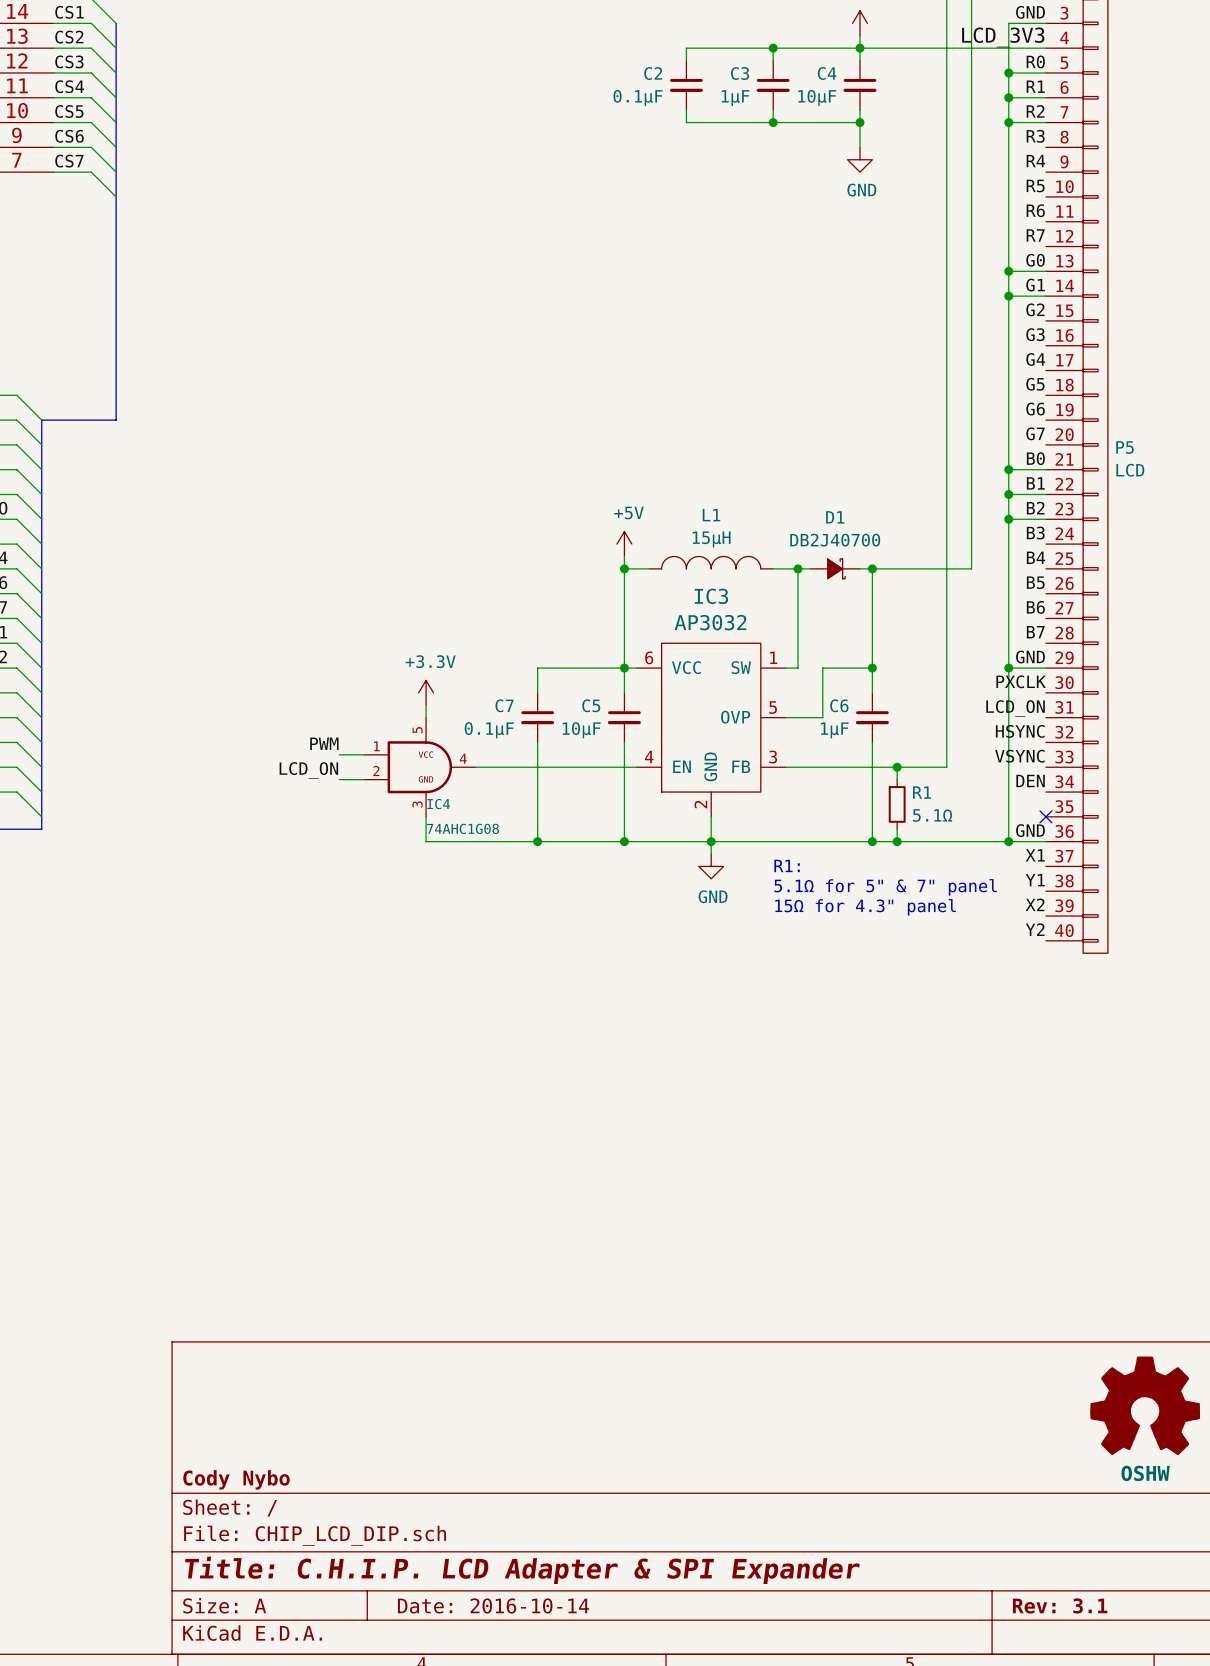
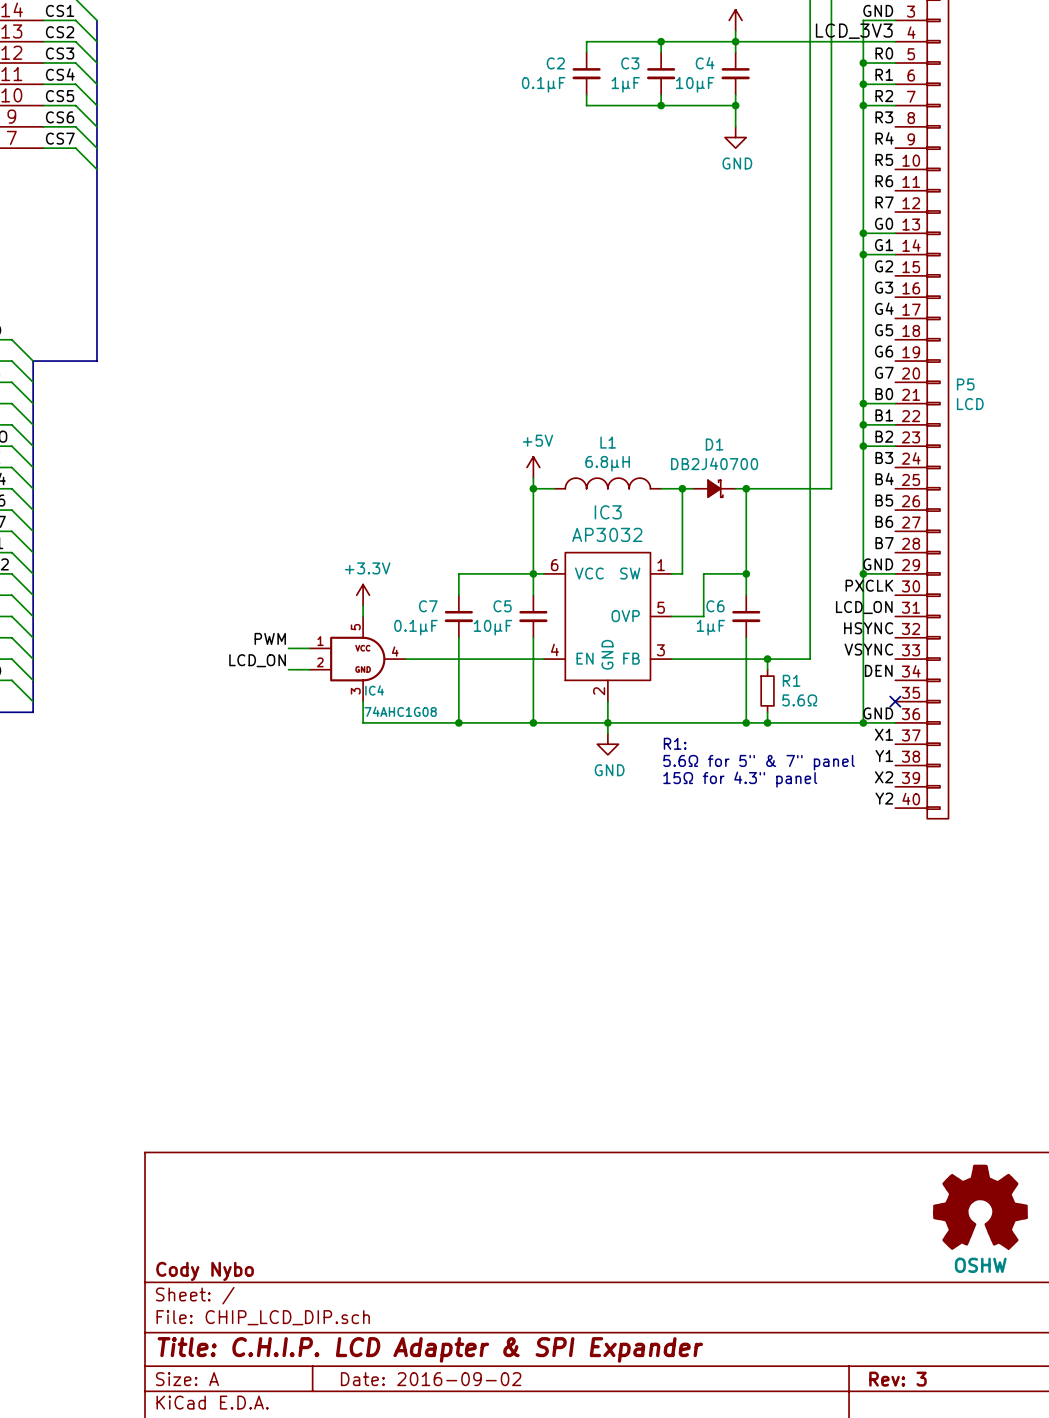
L1 value: 15µH (711, 539) -> 6.8µH (607, 463)
R1 value: 5.1Ω (932, 815) -> 5.6Ω (799, 700)
text: 5.1Ω for 5" & 7" panel (885, 887) -> 5.6Ω for 5" & 7" panel (759, 762)
title block: Date: 2016-10-14 (493, 1605) -> Date: 2016-09-02 (431, 1379)
title block: Rev: 3.1 (1060, 1605) -> Rev: 3 (897, 1379)

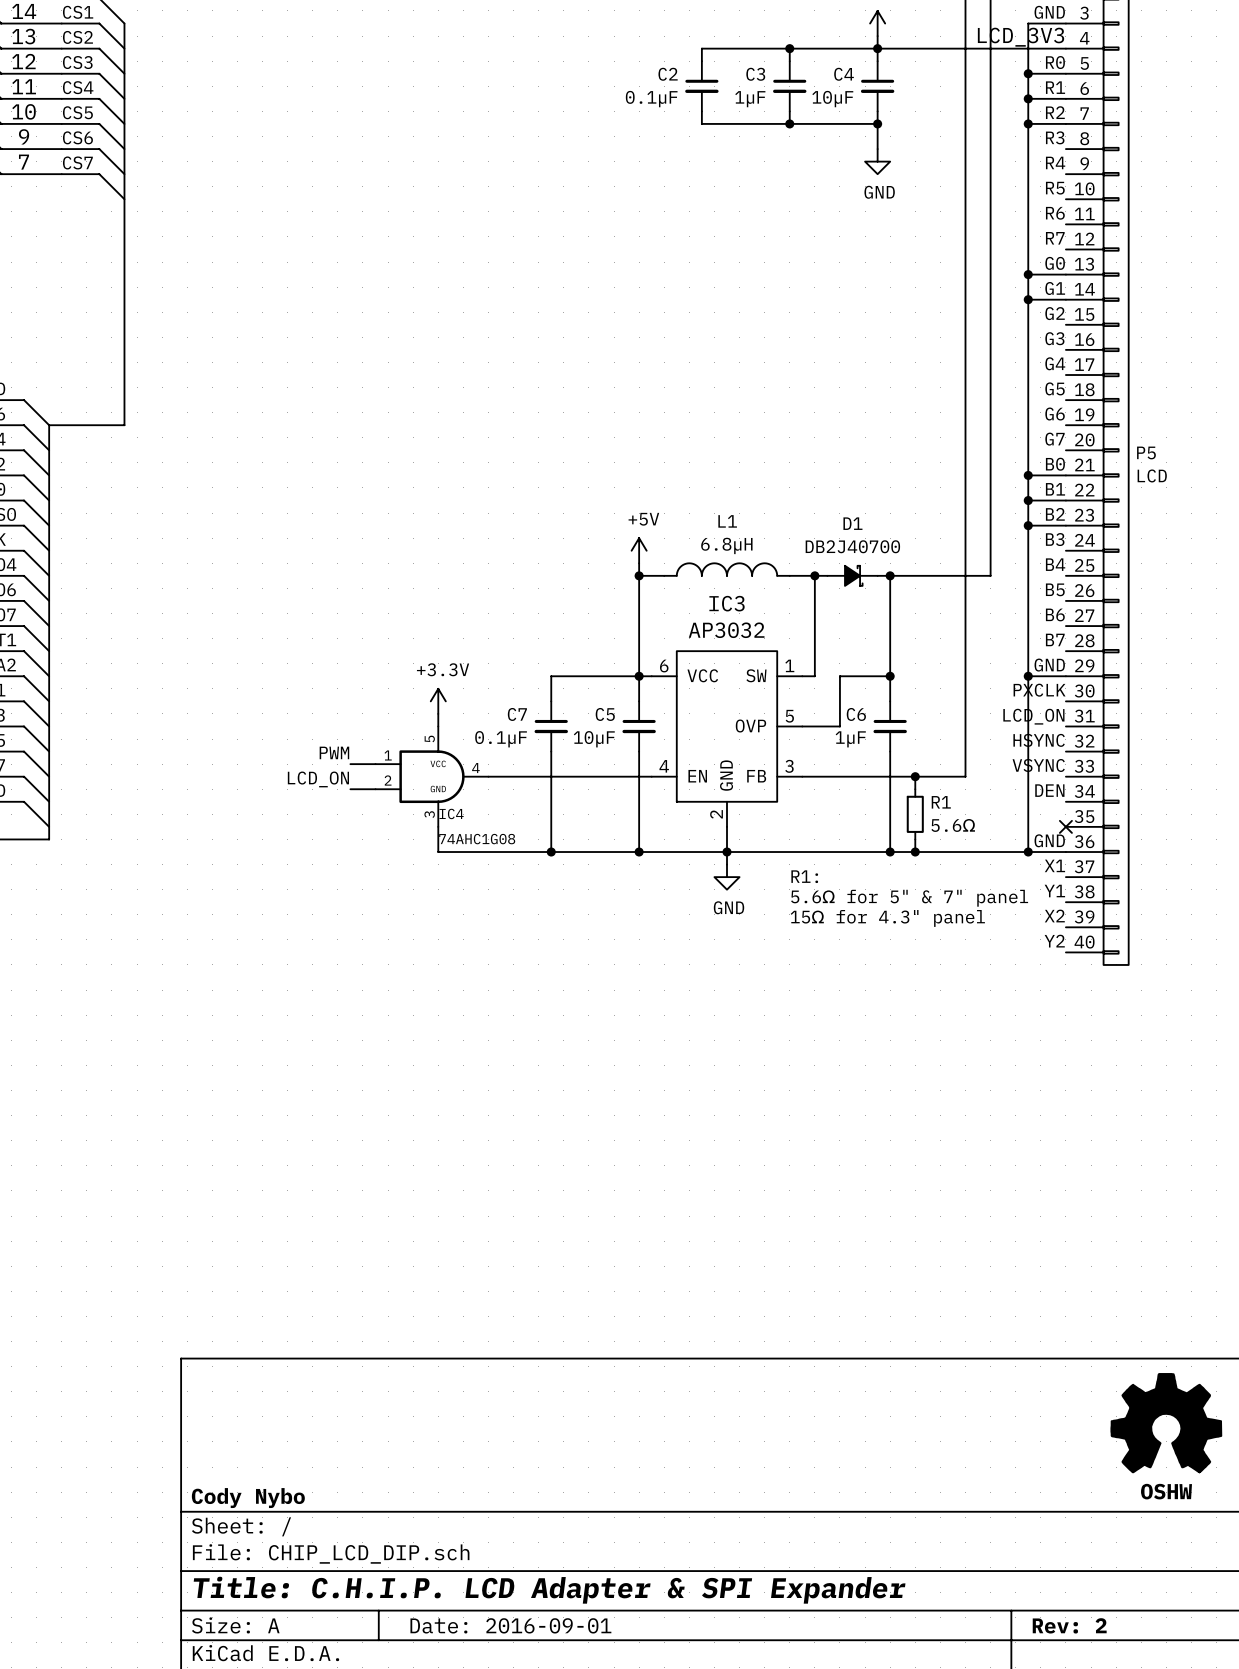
title block: Date: 2016-09-02 (431, 1379) -> Date: 2016-09-01 (510, 1625)
title block: Rev: 3 (897, 1379) -> Rev: 2 (1069, 1625)

